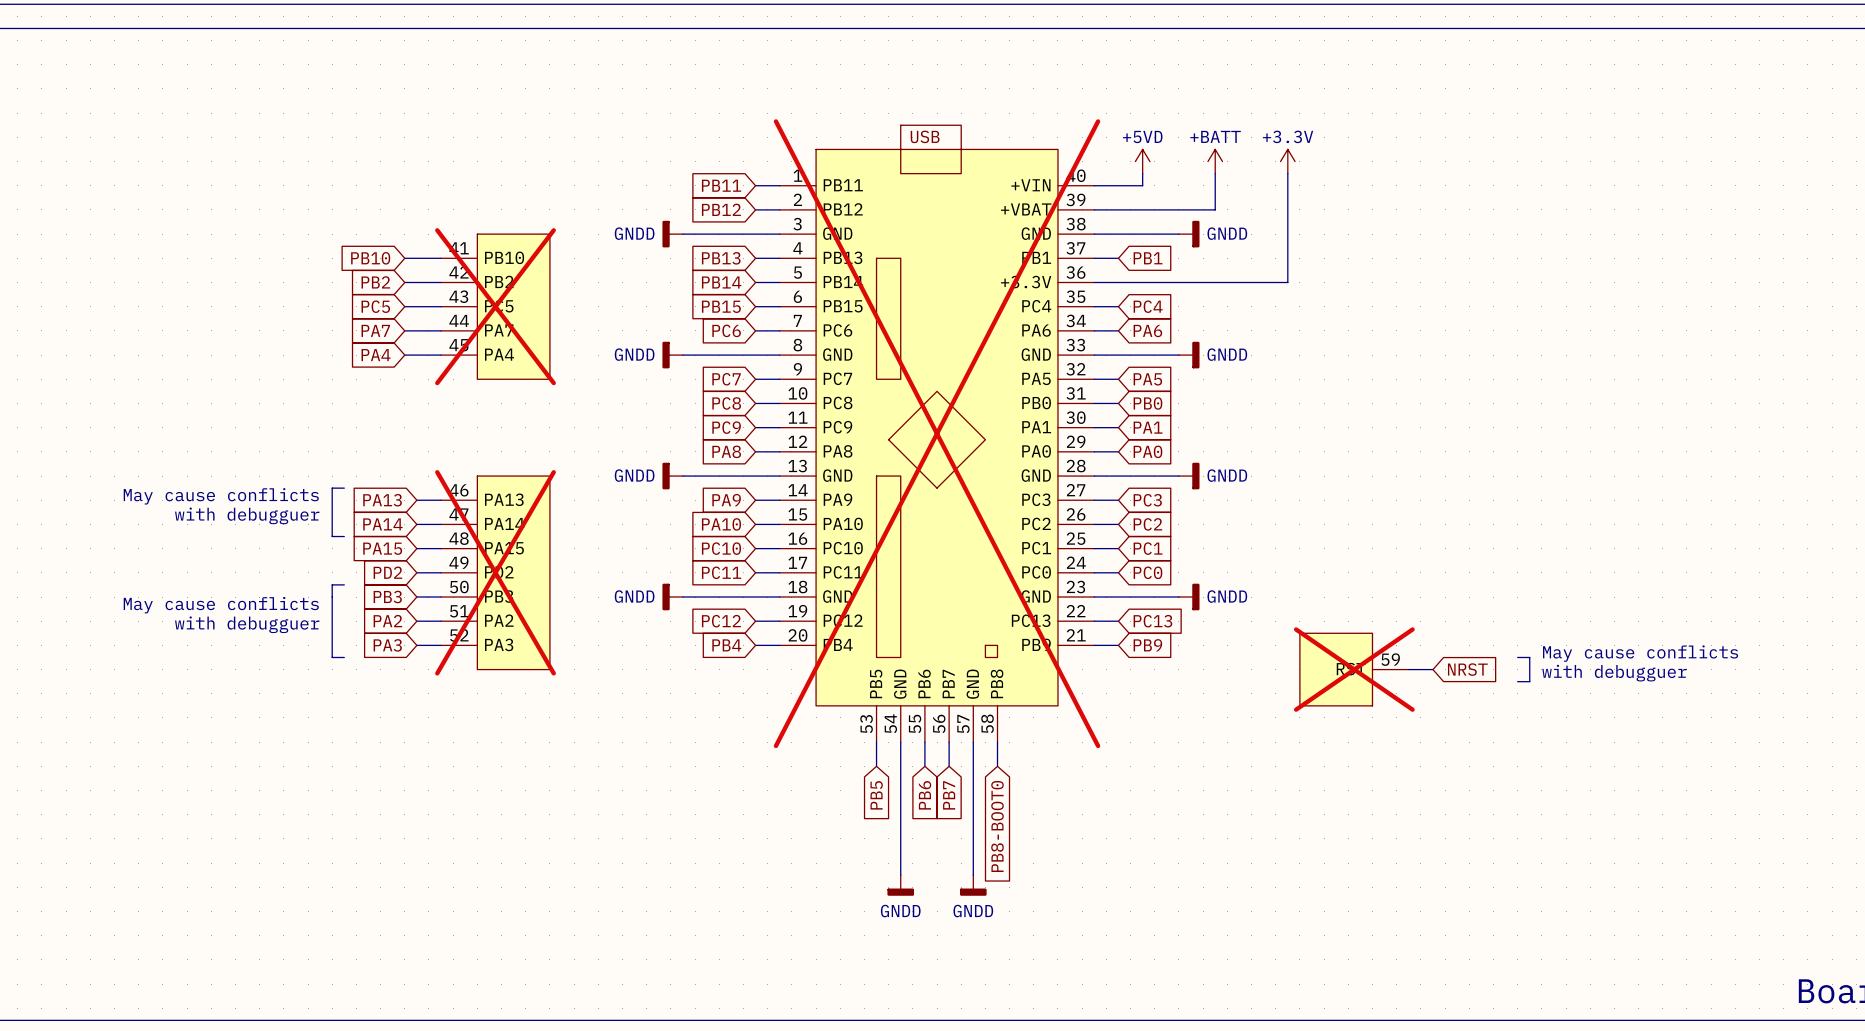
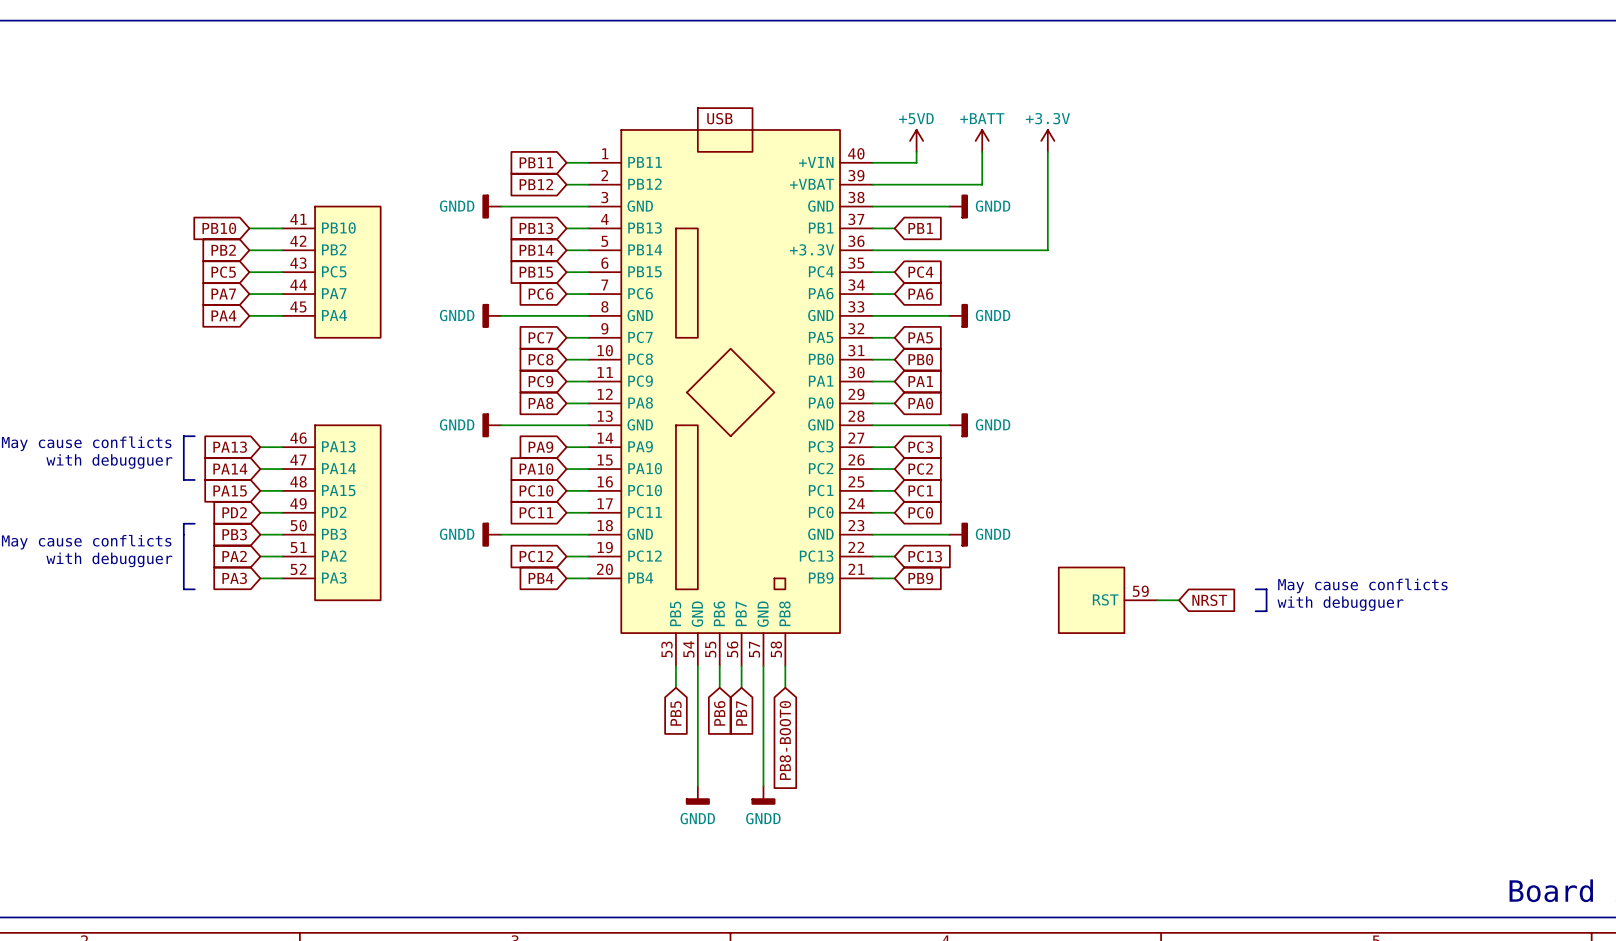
part do-not-place cross: (495, 306) -> none
part do-not-place cross: (937, 433) -> none
part do-not-place cross: (495, 572) -> none
part do-not-place cross: (1354, 669) -> none

